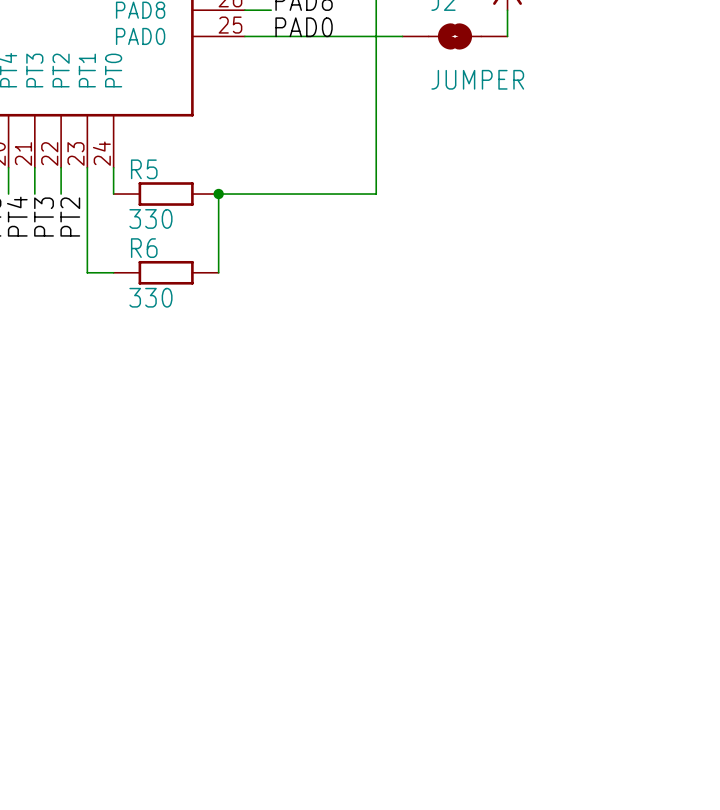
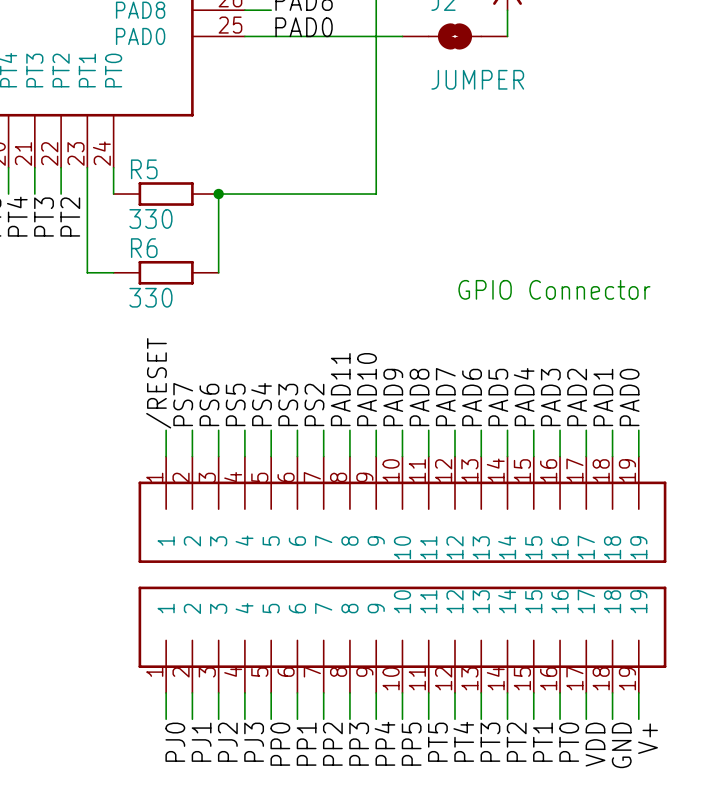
text: none -> GPIO Connector (554, 289)
label: none -> /RESET (158, 383)
label: none -> PAD11 (340, 389)
label: none -> PAD10 (367, 389)
label: none -> PAD9 (393, 397)
label: none -> PAD8 (419, 397)
label: none -> PAD7 (445, 397)
label: none -> PAD6 (472, 397)
label: none -> PAD5 (498, 397)
label: none -> PAD4 (524, 397)
label: none -> PAD3 (550, 397)
label: none -> PAD2 (577, 397)
label: none -> PAD1 (603, 397)
label: none -> PAD0 (629, 397)
label: none -> PS7 (183, 404)
label: none -> PS6 (209, 404)
label: none -> PS5 (235, 404)
label: none -> PS4 (261, 404)
label: none -> PS3 (288, 404)
label: none -> PS2 (314, 404)
wire: none -> (166, 430) (166, 456)
wire: none -> (192, 430) (192, 456)
wire: none -> (218, 430) (218, 456)
wire: none -> (244, 430) (244, 456)
wire: none -> (271, 430) (271, 456)
wire: none -> (297, 430) (297, 456)
wire: none -> (323, 430) (323, 456)
wire: none -> (349, 430) (349, 456)
wire: none -> (376, 430) (376, 456)
wire: none -> (402, 430) (402, 456)
wire: none -> (428, 430) (428, 456)
wire: none -> (454, 430) (454, 456)
wire: none -> (481, 430) (481, 456)
wire: none -> (507, 430) (507, 456)
wire: none -> (533, 430) (533, 456)
wire: none -> (560, 430) (560, 456)
wire: none -> (586, 430) (586, 456)
wire: none -> (612, 430) (612, 456)
wire: none -> (638, 430) (638, 456)
part: none -> (402, 509)
part: none -> (402, 639)
wire: none -> (166, 692) (166, 719)
wire: none -> (192, 692) (192, 719)
wire: none -> (218, 692) (218, 719)
wire: none -> (244, 692) (244, 719)
wire: none -> (271, 692) (271, 719)
wire: none -> (297, 692) (297, 719)
wire: none -> (323, 692) (323, 719)
wire: none -> (349, 692) (349, 719)
wire: none -> (376, 692) (376, 719)
wire: none -> (402, 692) (402, 719)
wire: none -> (428, 692) (428, 719)
wire: none -> (454, 692) (454, 719)
wire: none -> (481, 692) (481, 719)
wire: none -> (507, 692) (507, 719)
wire: none -> (533, 692) (533, 719)
wire: none -> (560, 692) (560, 719)
wire: none -> (586, 692) (586, 719)
wire: none -> (612, 692) (612, 719)
wire: none -> (638, 692) (638, 719)
label: none -> V+ (648, 738)
label: none -> PT4 (463, 741)
label: none -> PJ0 (175, 742)
label: none -> PJ1 (201, 742)
label: none -> PJ2 (227, 742)
label: none -> PJ3 (254, 742)
label: none -> PT5 (437, 742)
label: none -> PT3 (490, 742)
label: none -> PT2 (516, 742)
label: none -> PT1 (542, 742)
label: none -> PT0 (569, 742)
label: none -> PP4 (384, 743)
label: none -> PP0 (280, 744)
label: none -> PP1 (306, 744)
label: none -> PP2 (332, 744)
label: none -> PP3 (359, 744)
label: none -> PP5 (411, 744)
label: none -> VDD (595, 744)
label: none -> GND (621, 745)

